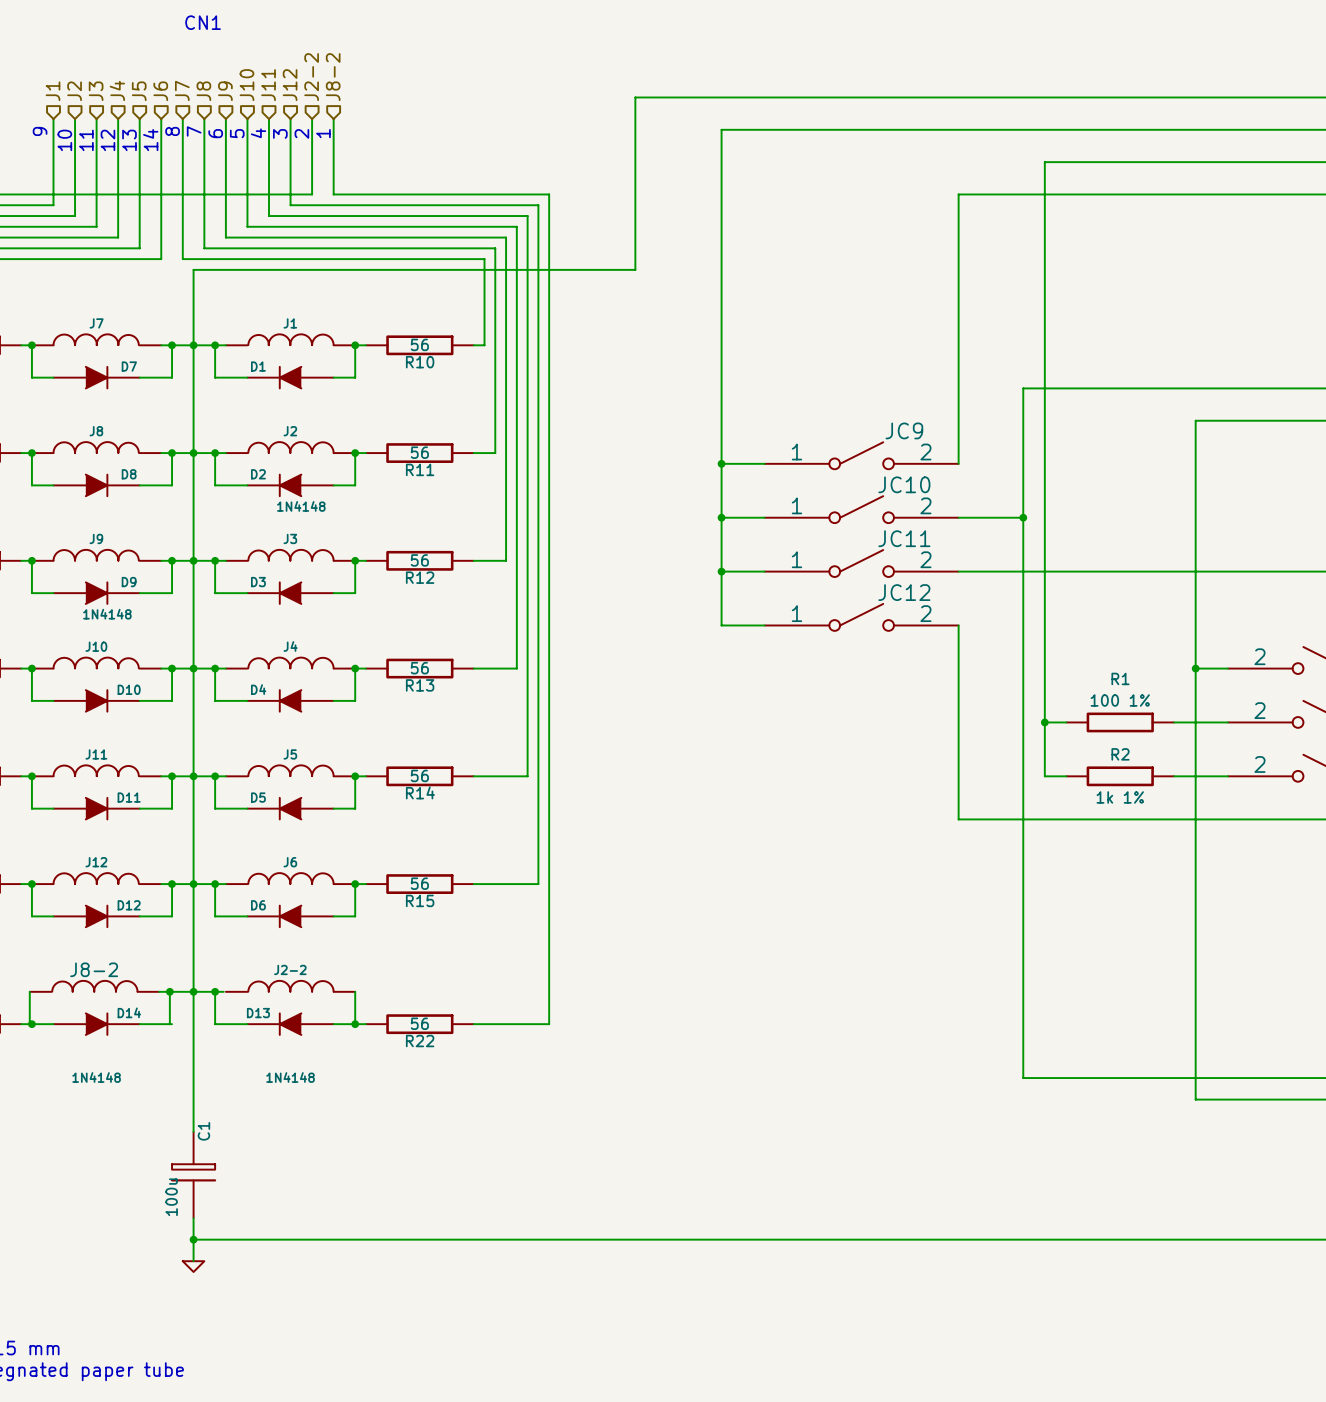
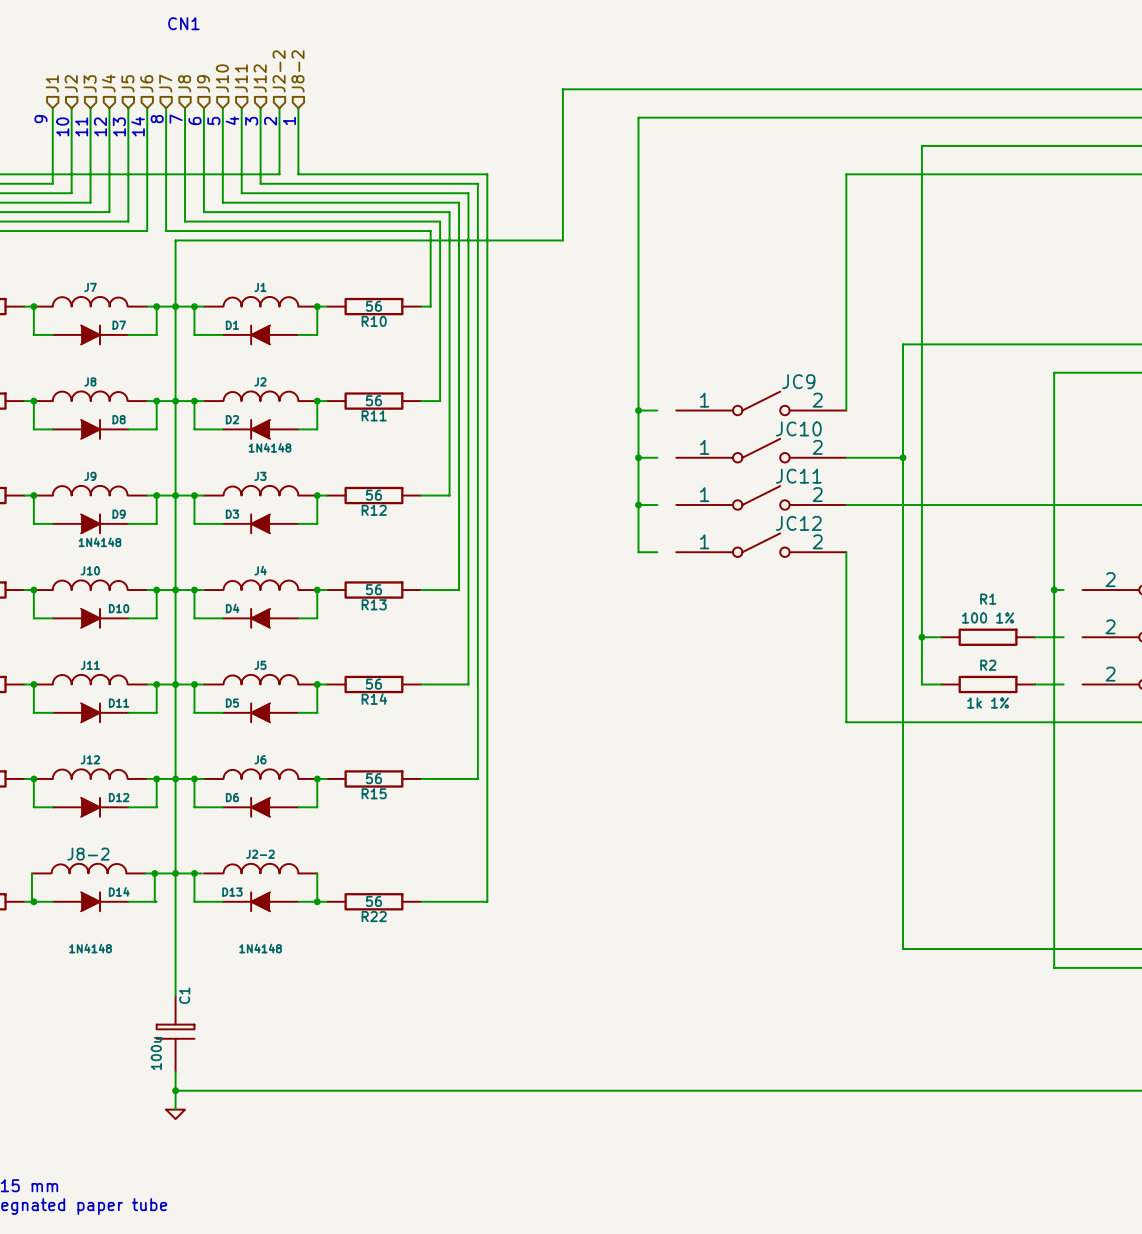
wire: (743, 463) (764, 463) -> none
wire: (743, 517) (764, 517) -> none
wire: (743, 571) (764, 571) -> none
wire: (743, 625) (764, 625) -> none
wire: (1206, 668) (1228, 668) -> none
wire: (1206, 722) (1228, 722) -> none
wire: (1206, 776) (1228, 776) -> none

